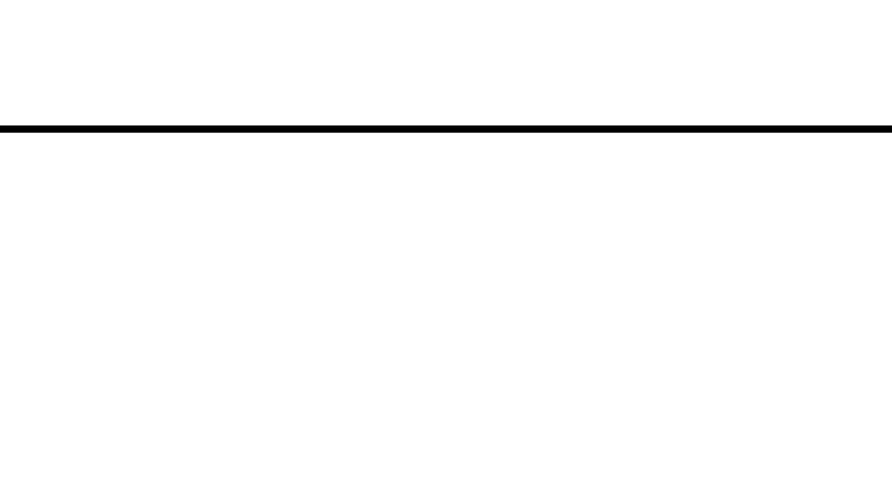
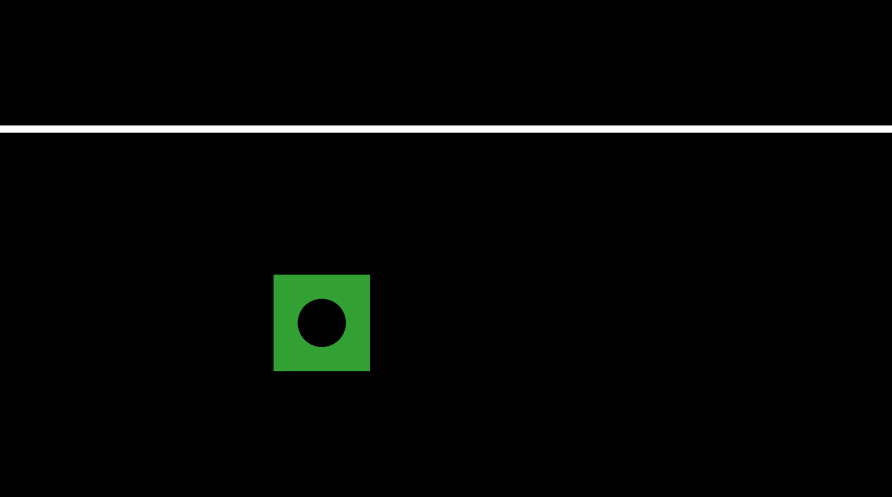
part: none -> (321, 322)

